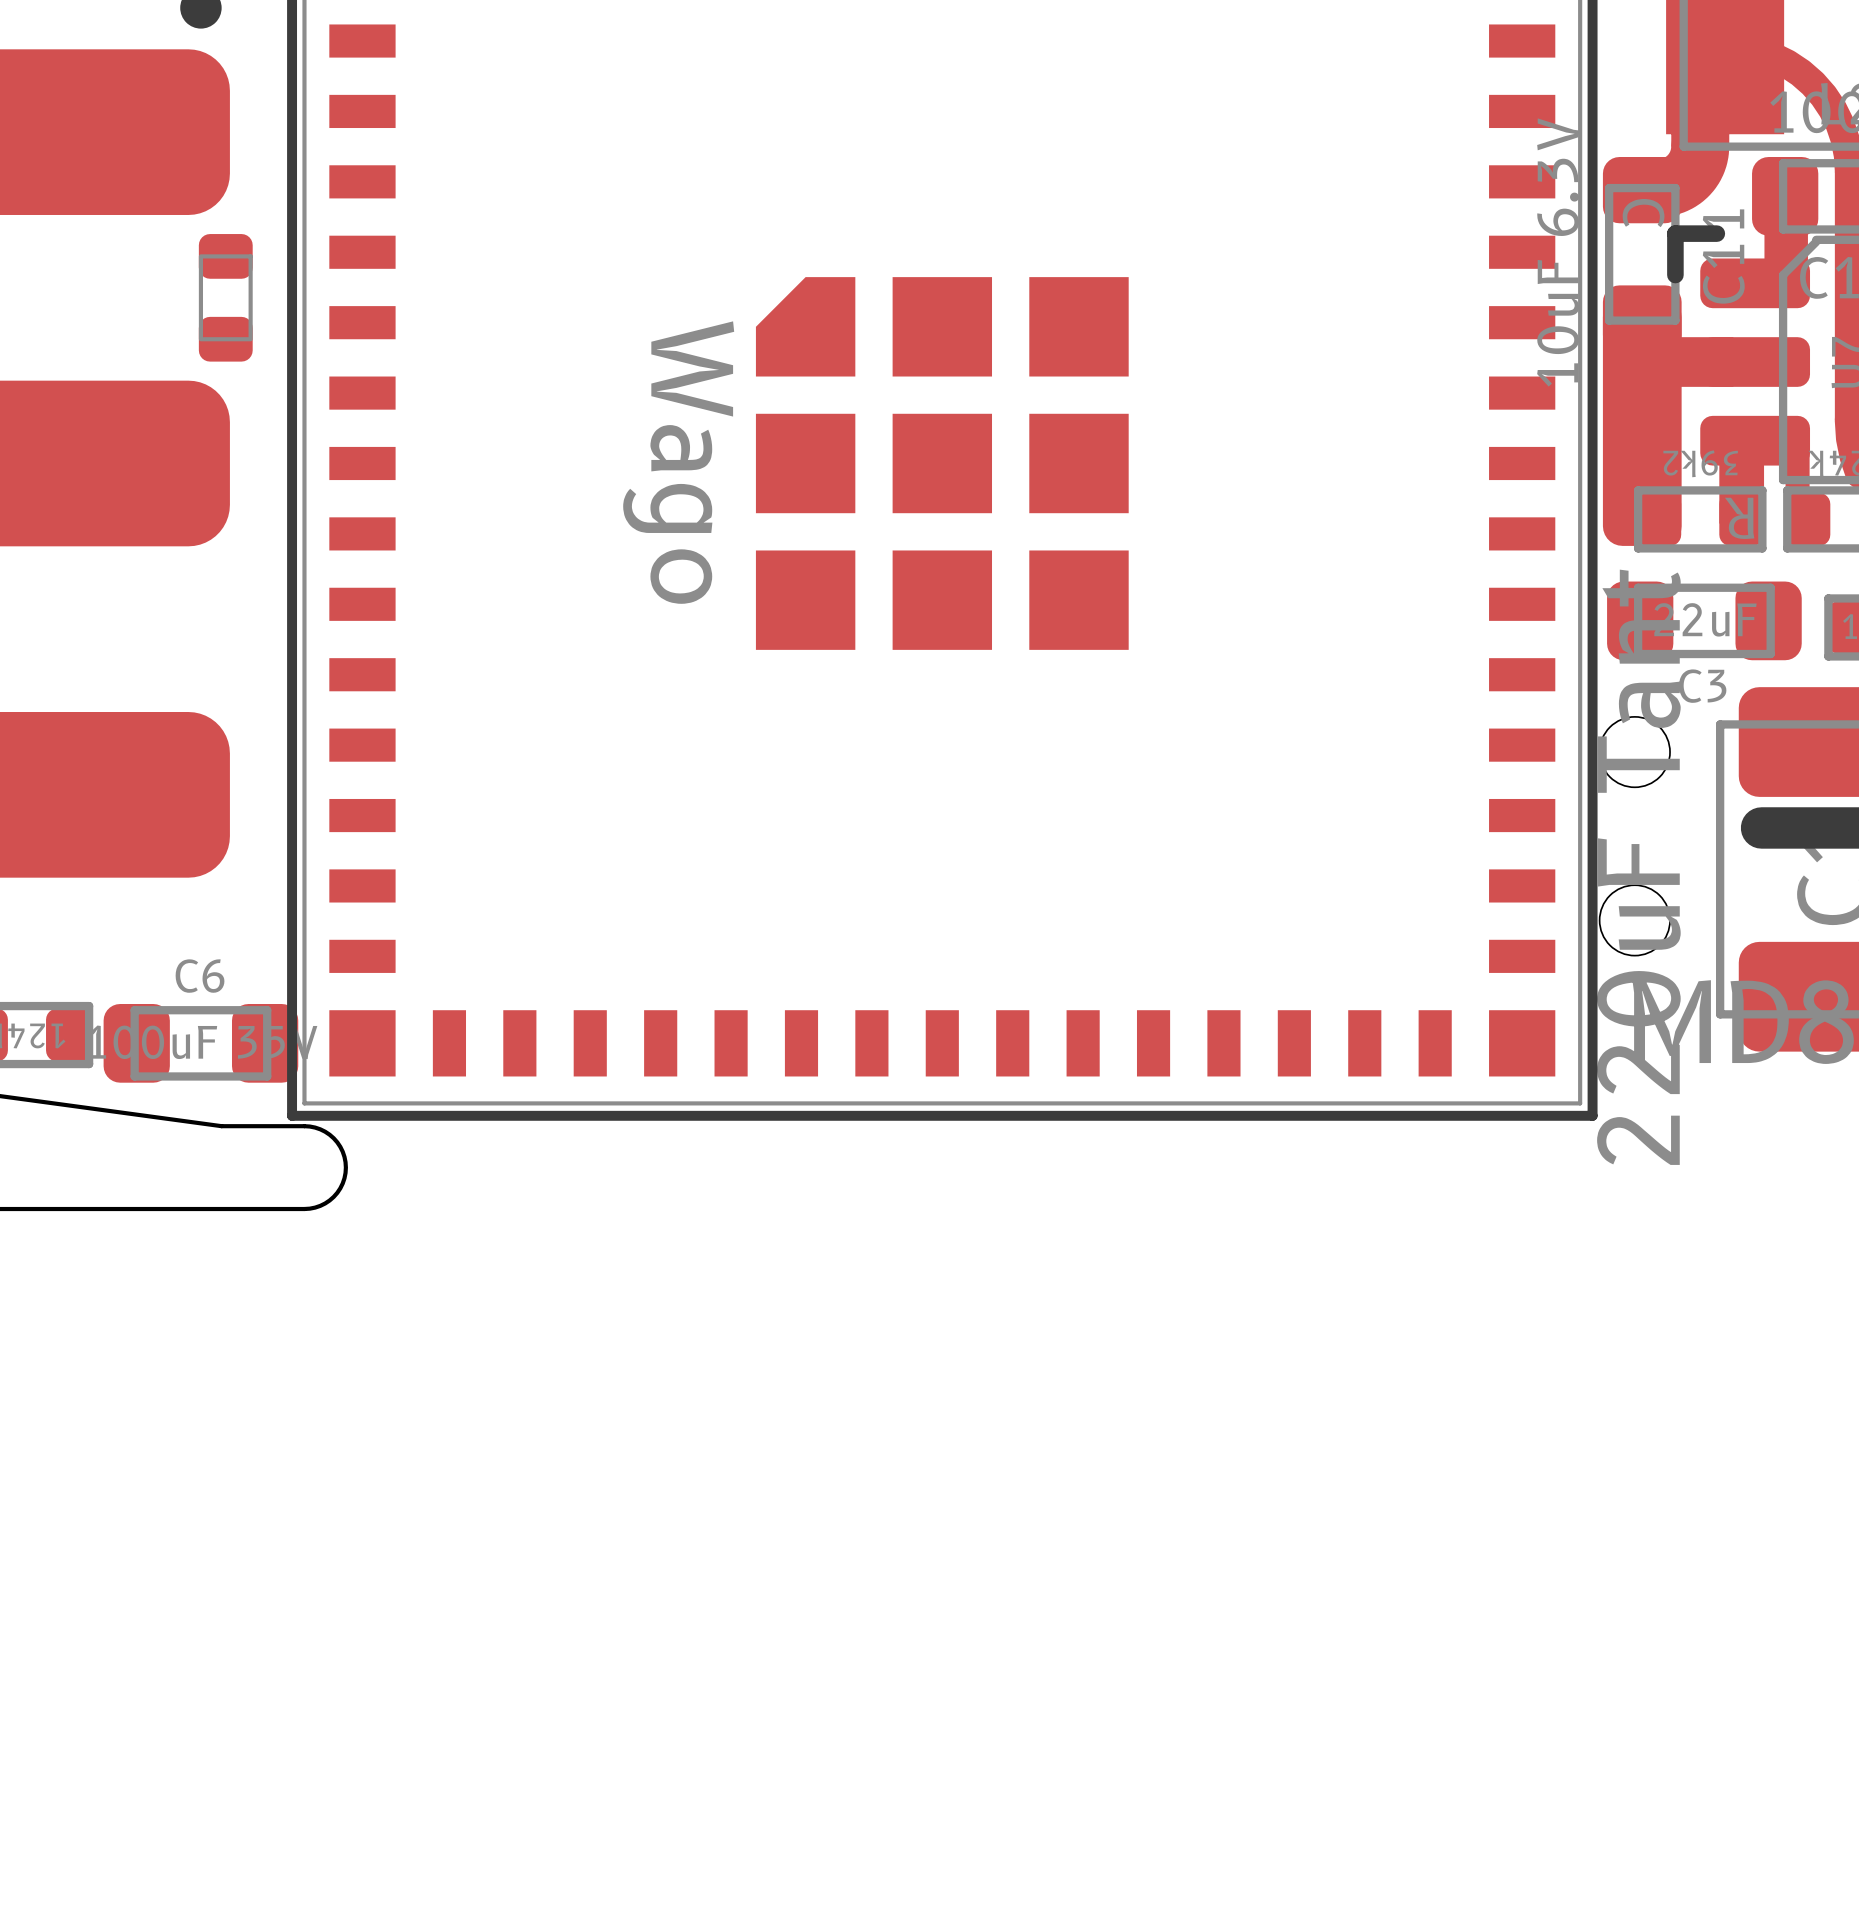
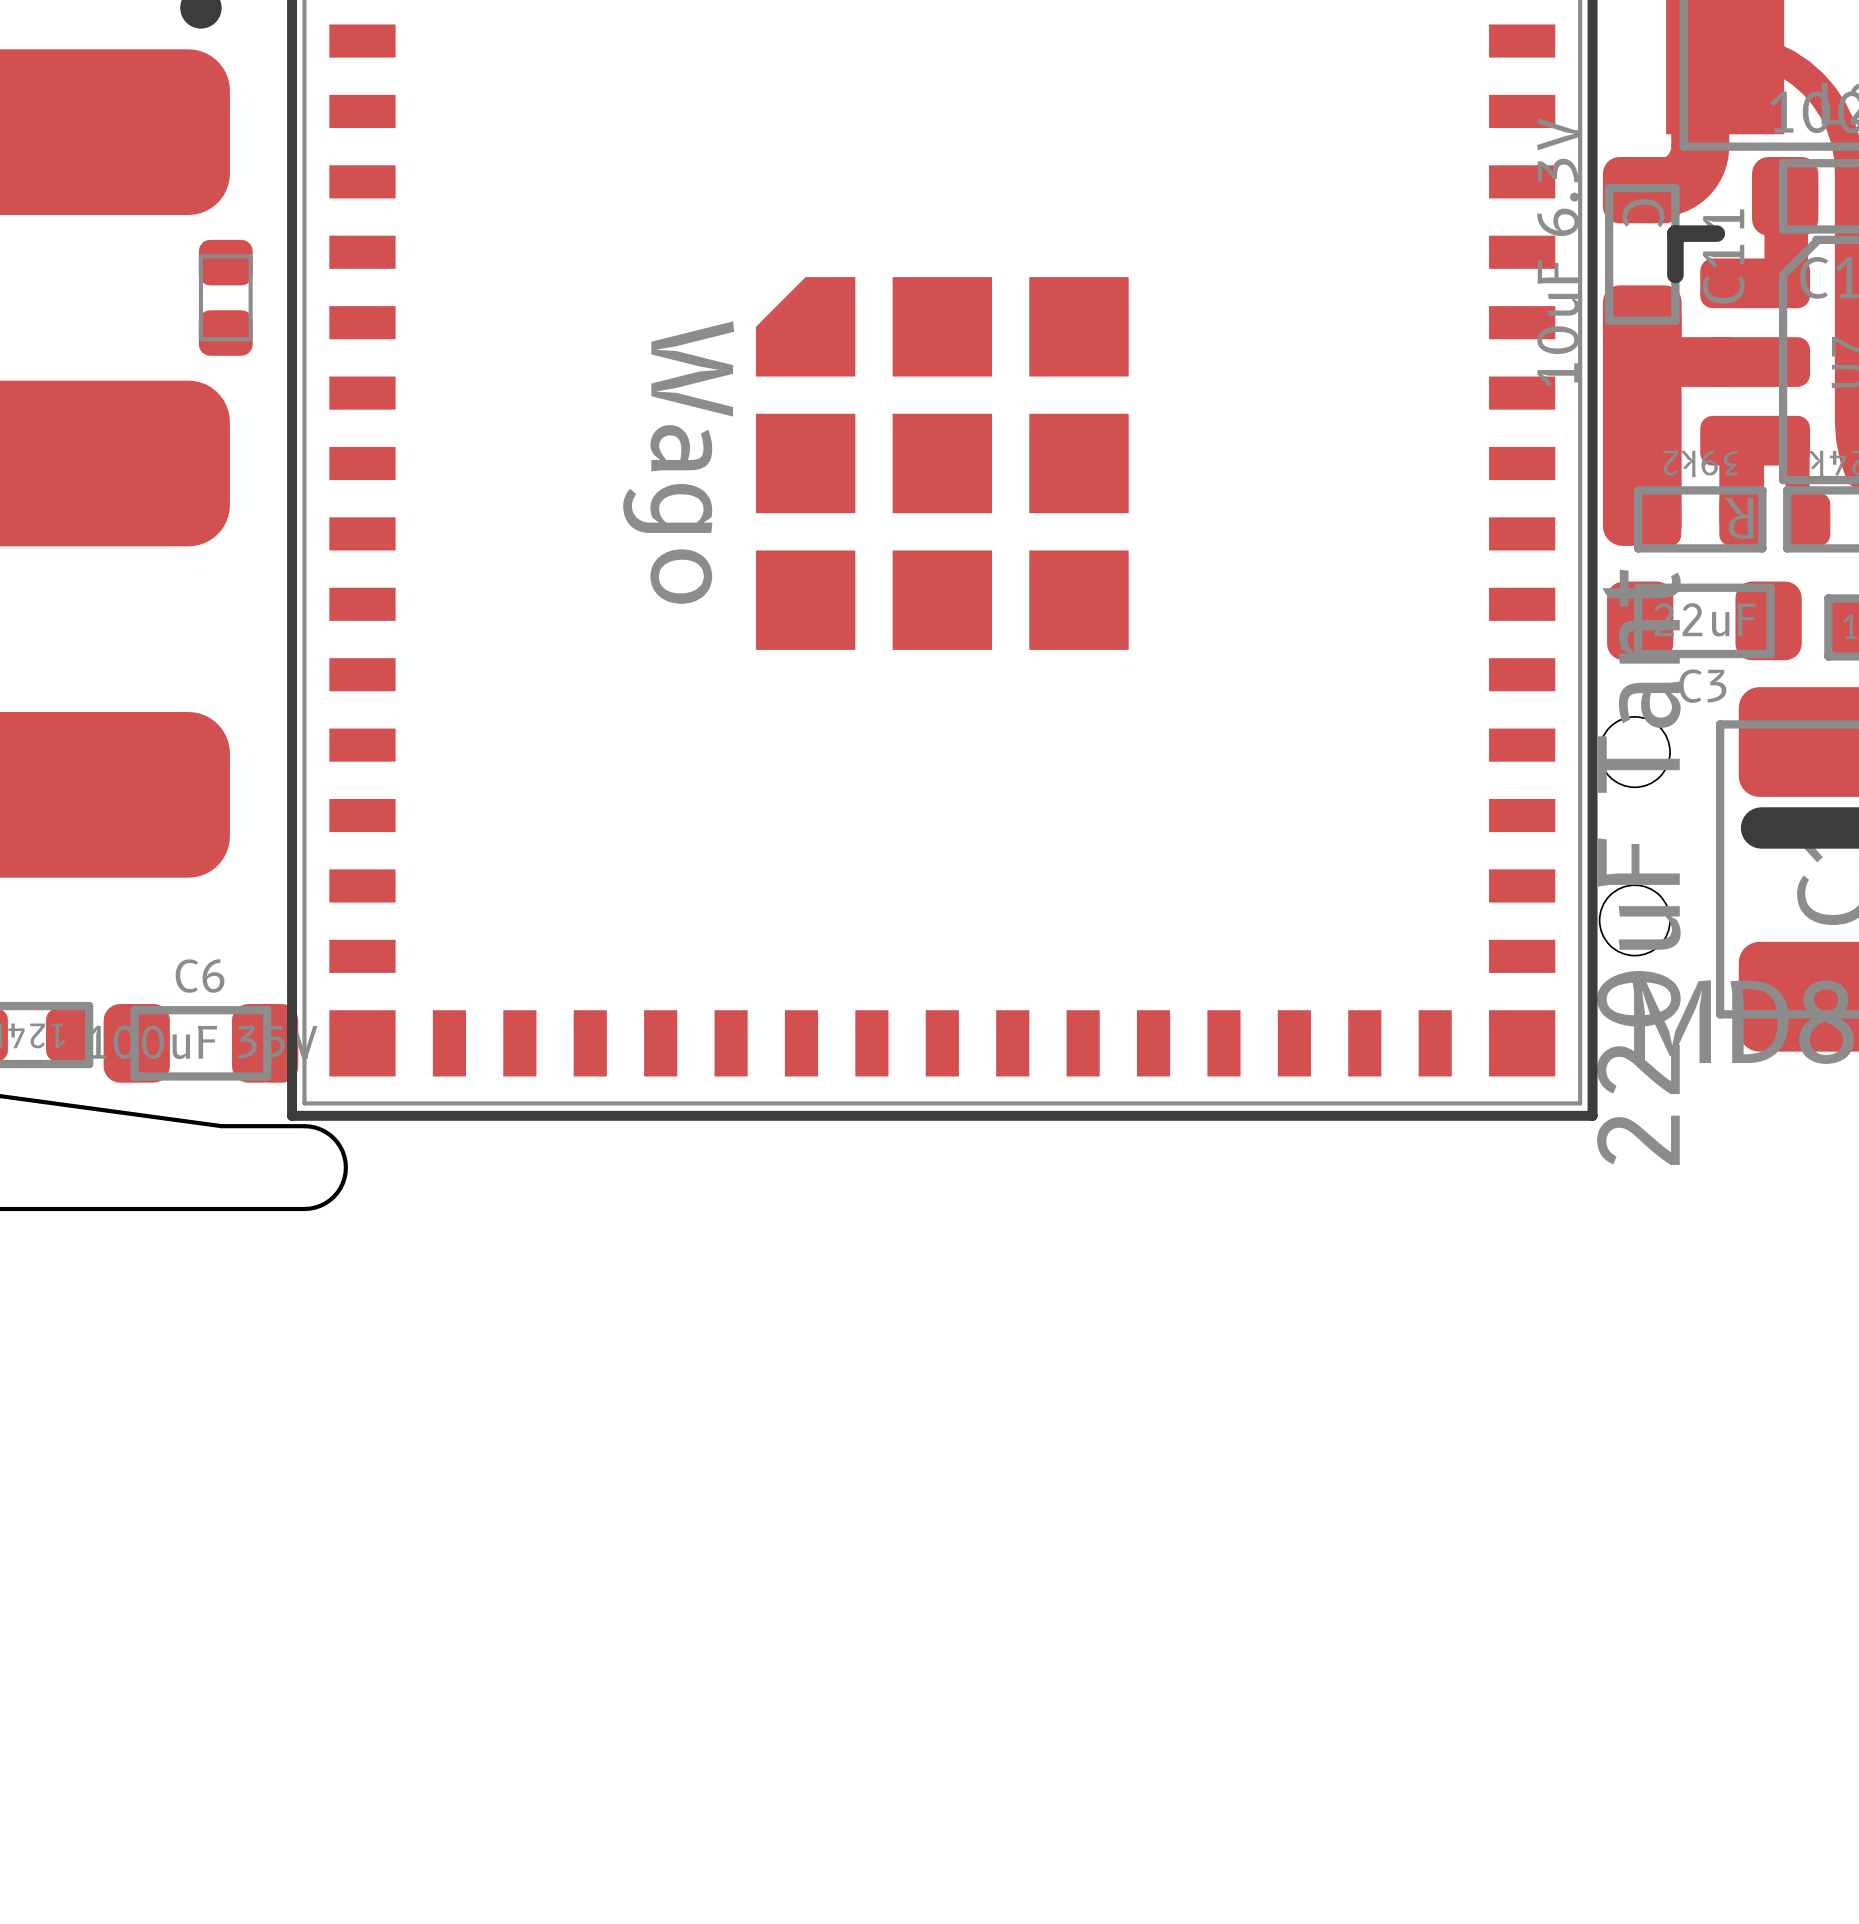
part footprint: [198, 234, 253, 362] -> [198, 239, 253, 356]

